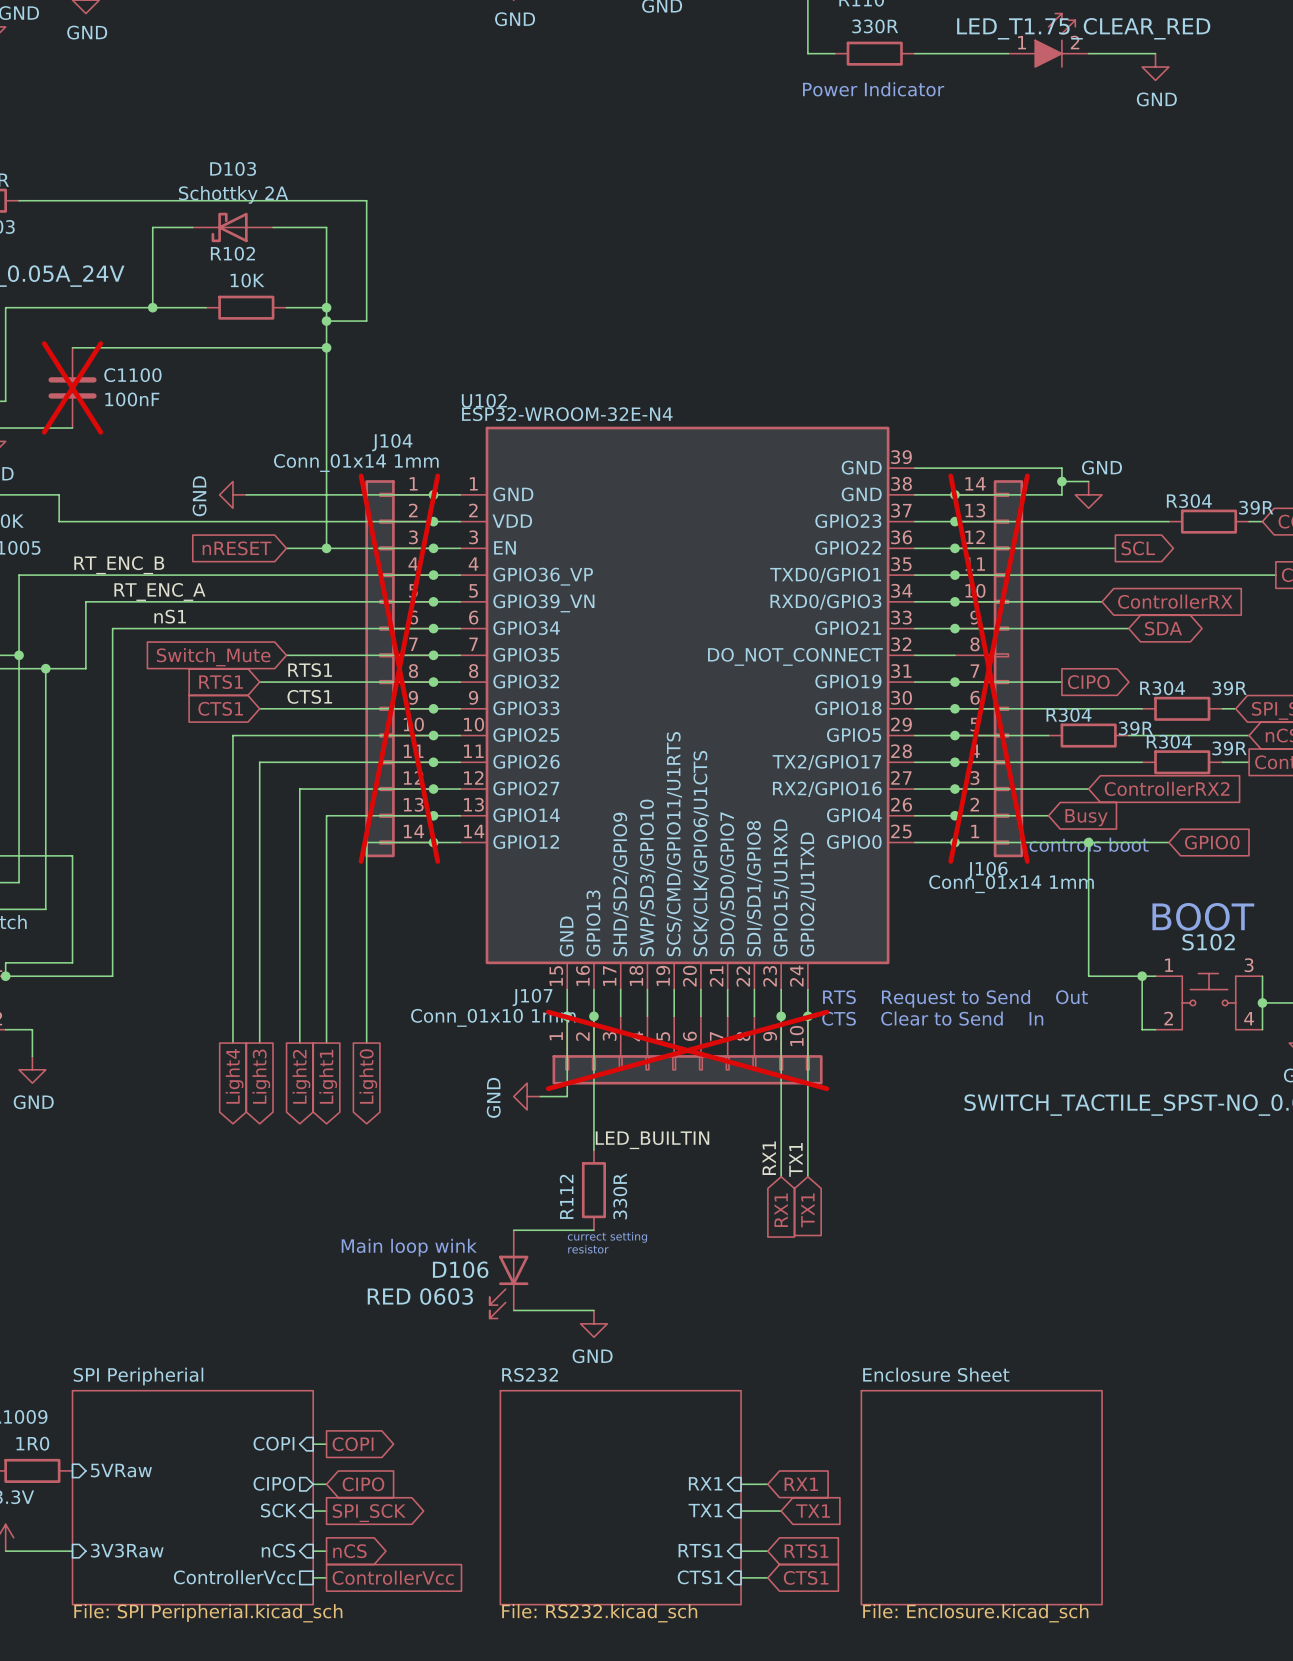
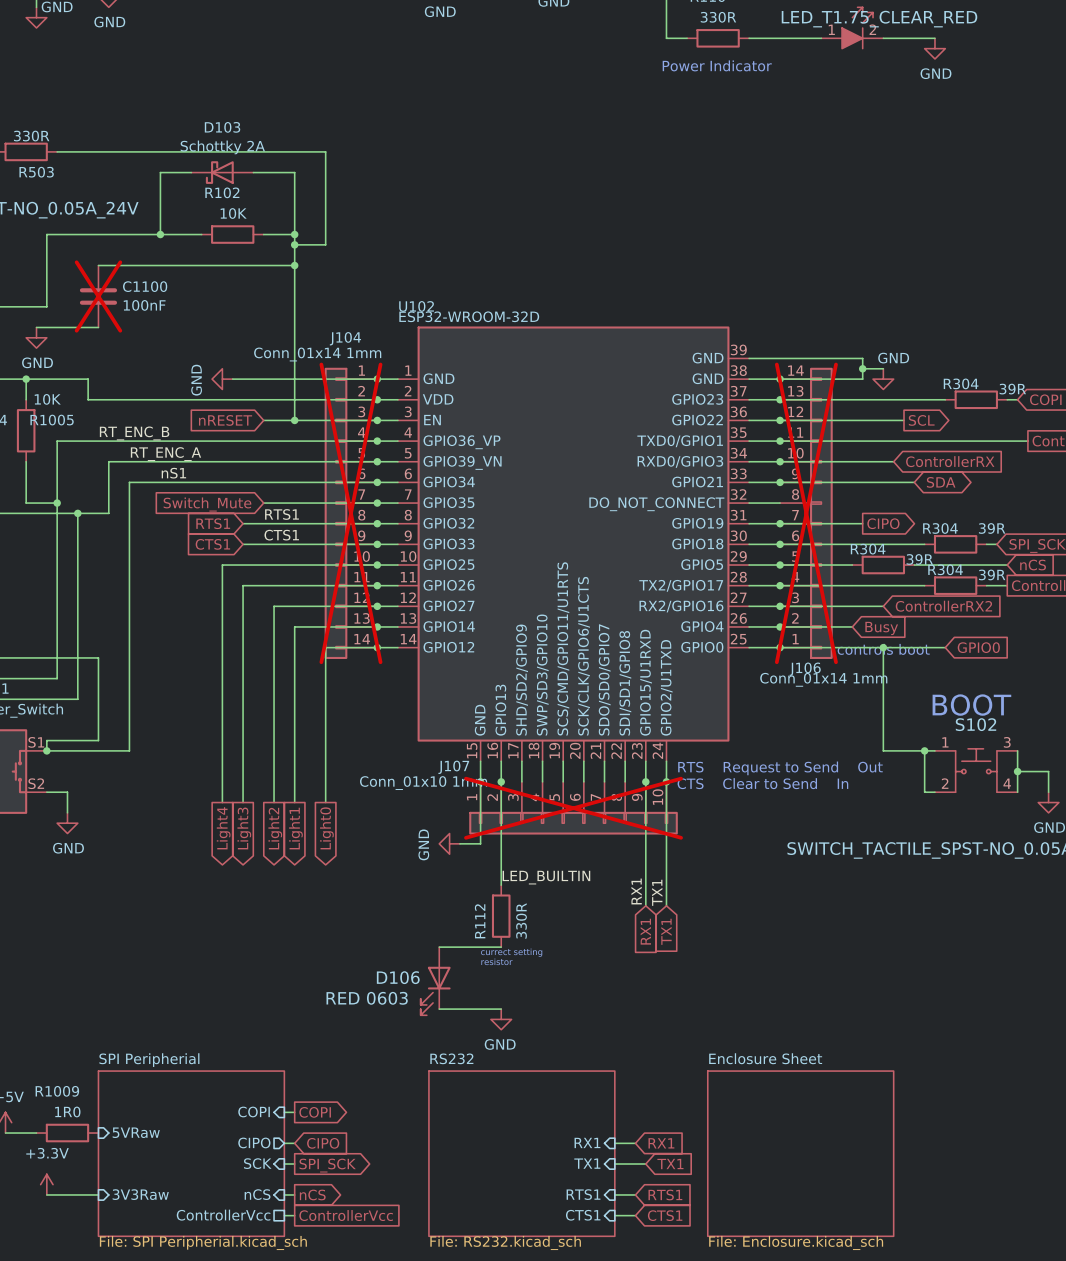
U102 value: ESP32-WROOM-32E-N4 (567, 414) -> ESP32-WROOM-32D (469, 316)
text: Main loop wink (409, 1247) -> none

